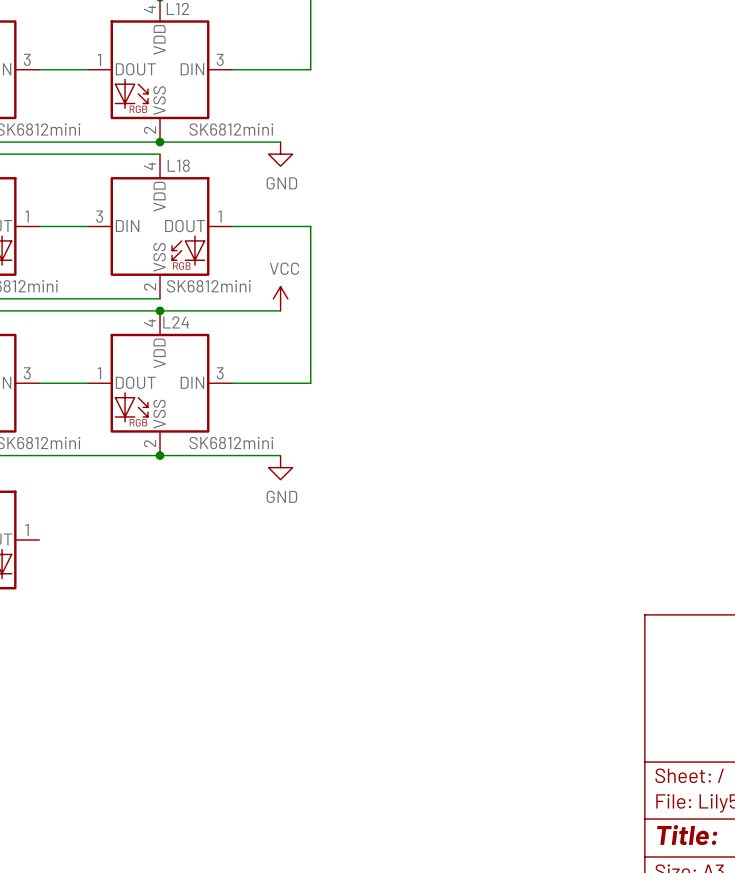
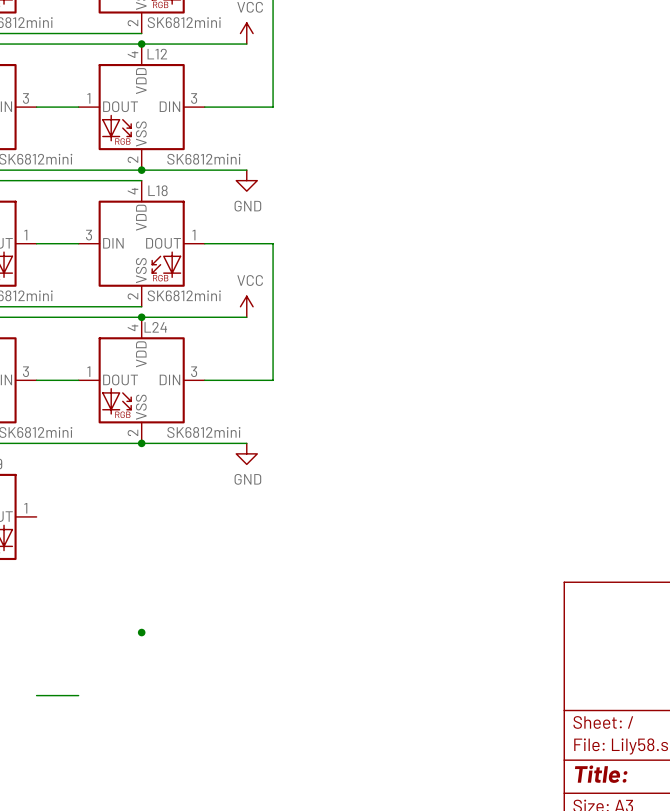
junction: none -> (141, 632)
wire: none -> (36, 695) (78, 695)

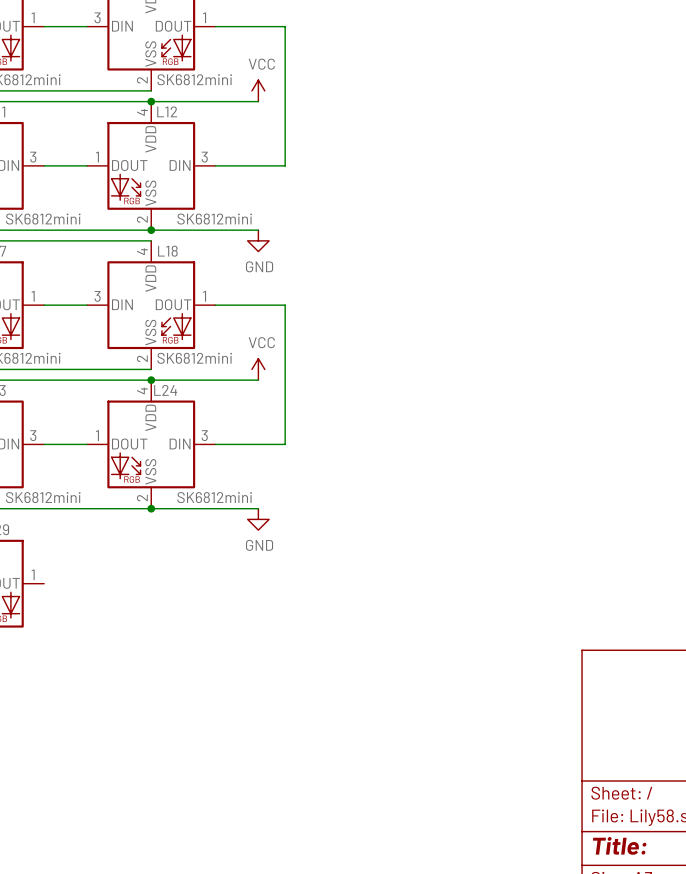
junction: (141, 632) -> none
wire: (36, 695) (78, 695) -> none

